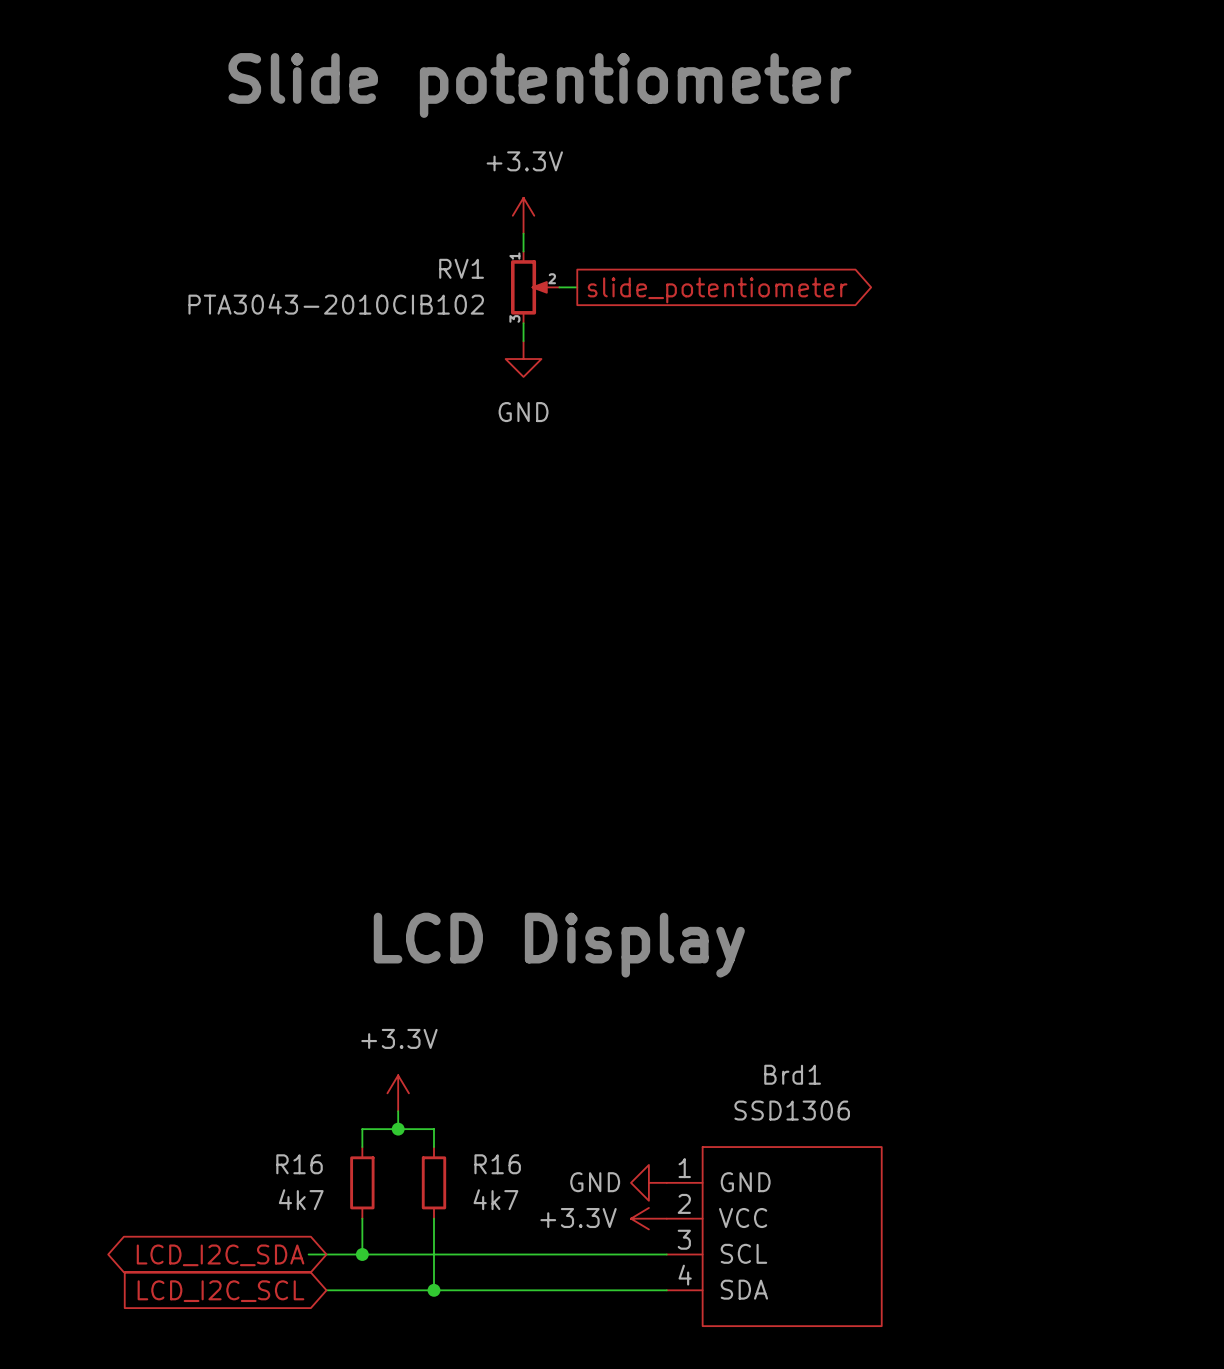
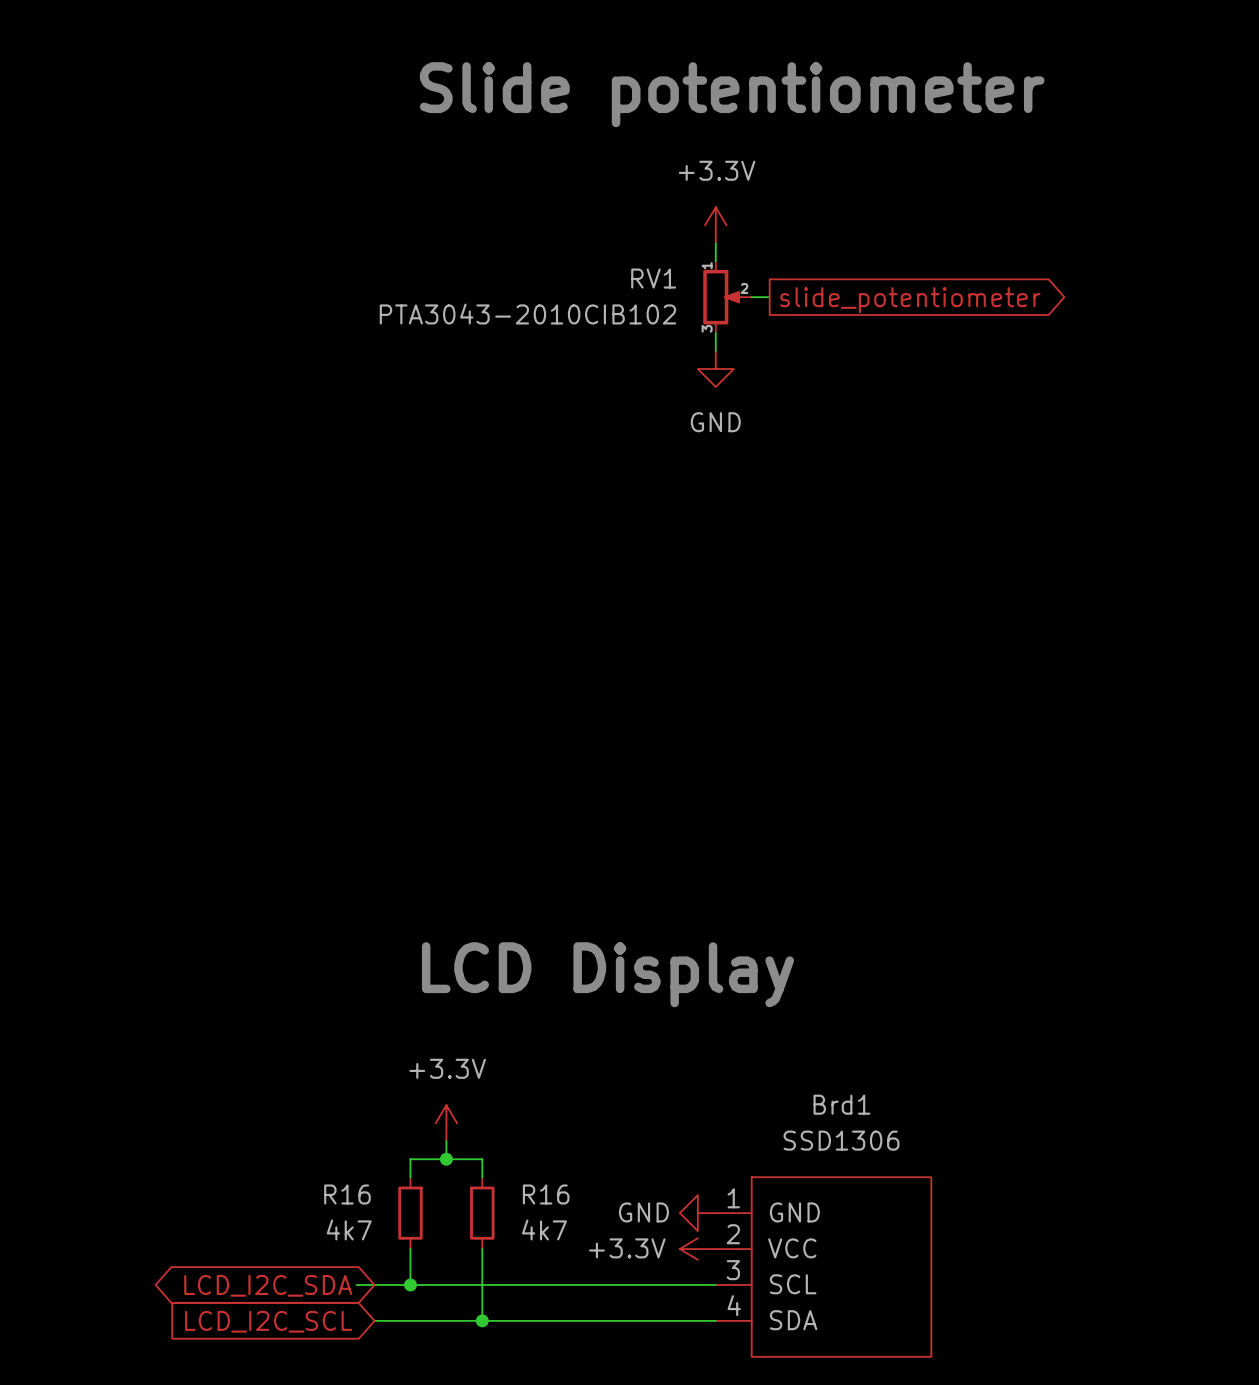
text position: Slide potentiometer (539, 85) -> Slide potentiometer (732, 94)
power symbol position: +3.3V (523, 215) -> +3.3V (715, 225)
wire: (523, 233) (523, 251) -> (715, 243) (715, 261)
RV1 position: (535, 287) -> (727, 297)
global label position: slide_potentiometer (717, 290) -> slide_potentiometer (910, 300)
wire: (523, 323) (523, 341) -> (715, 333) (715, 351)
power symbol position: GND (523, 359) -> GND (715, 369)

